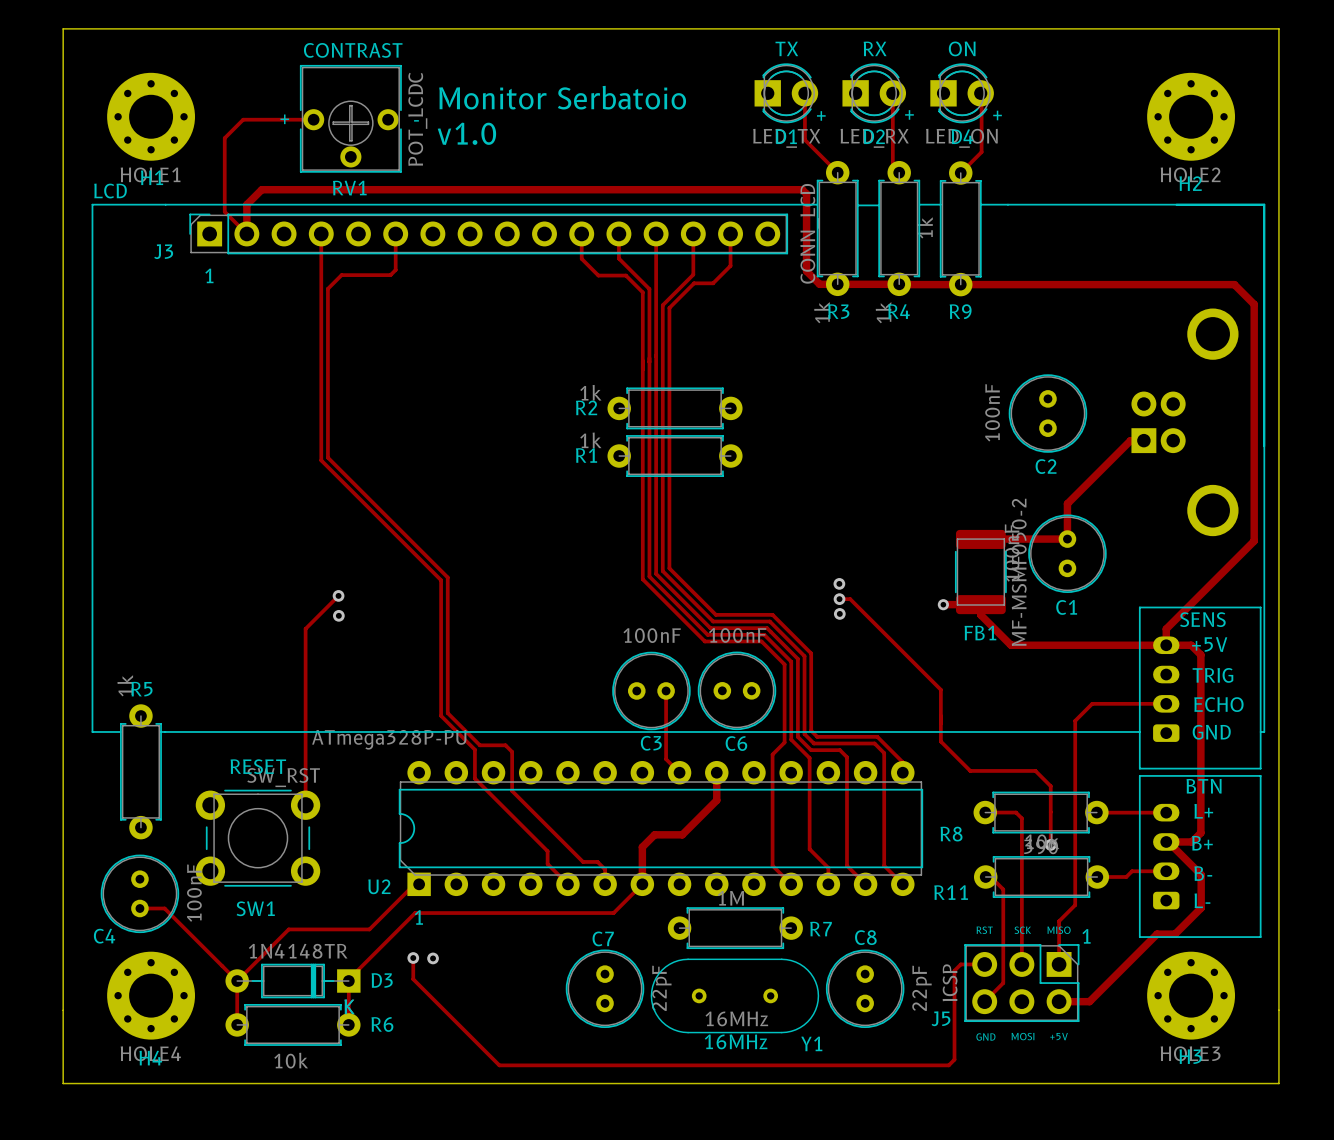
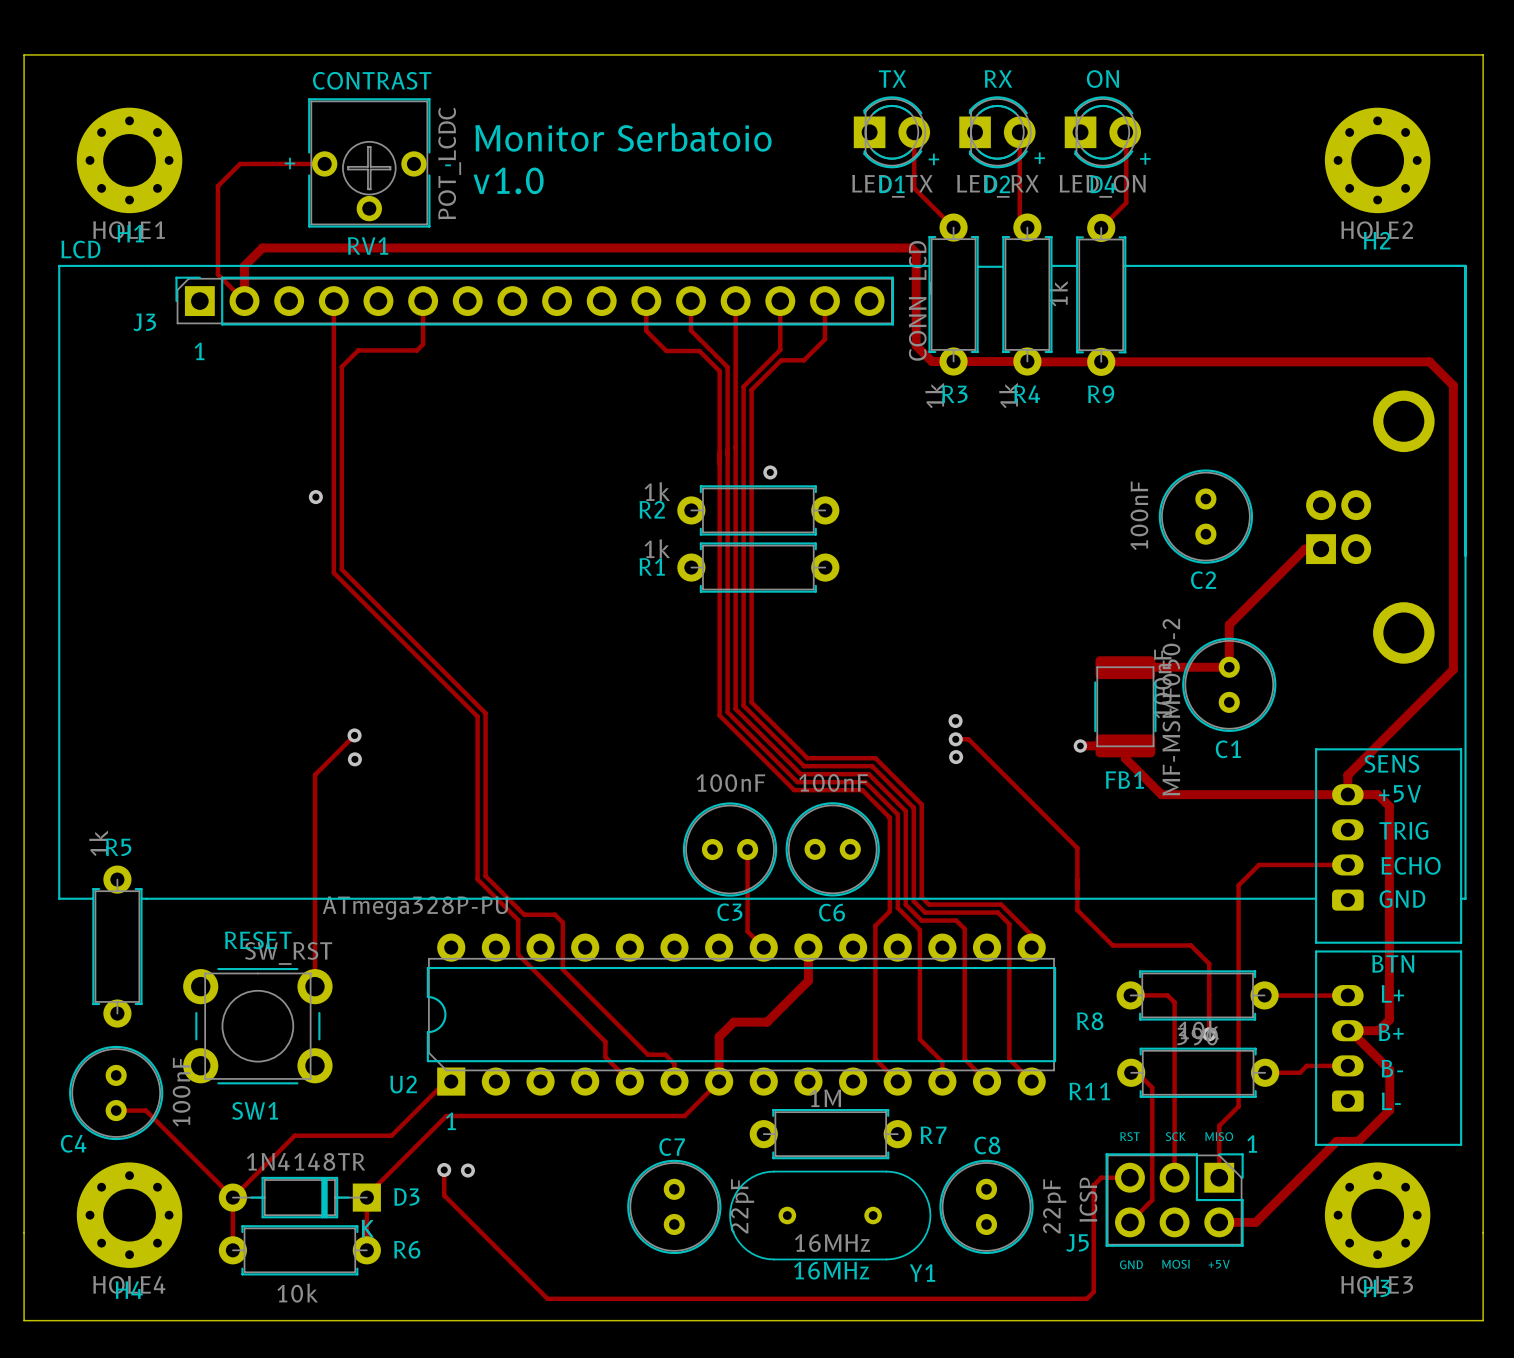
via: none -> (770, 472)
via: none -> (315, 497)

